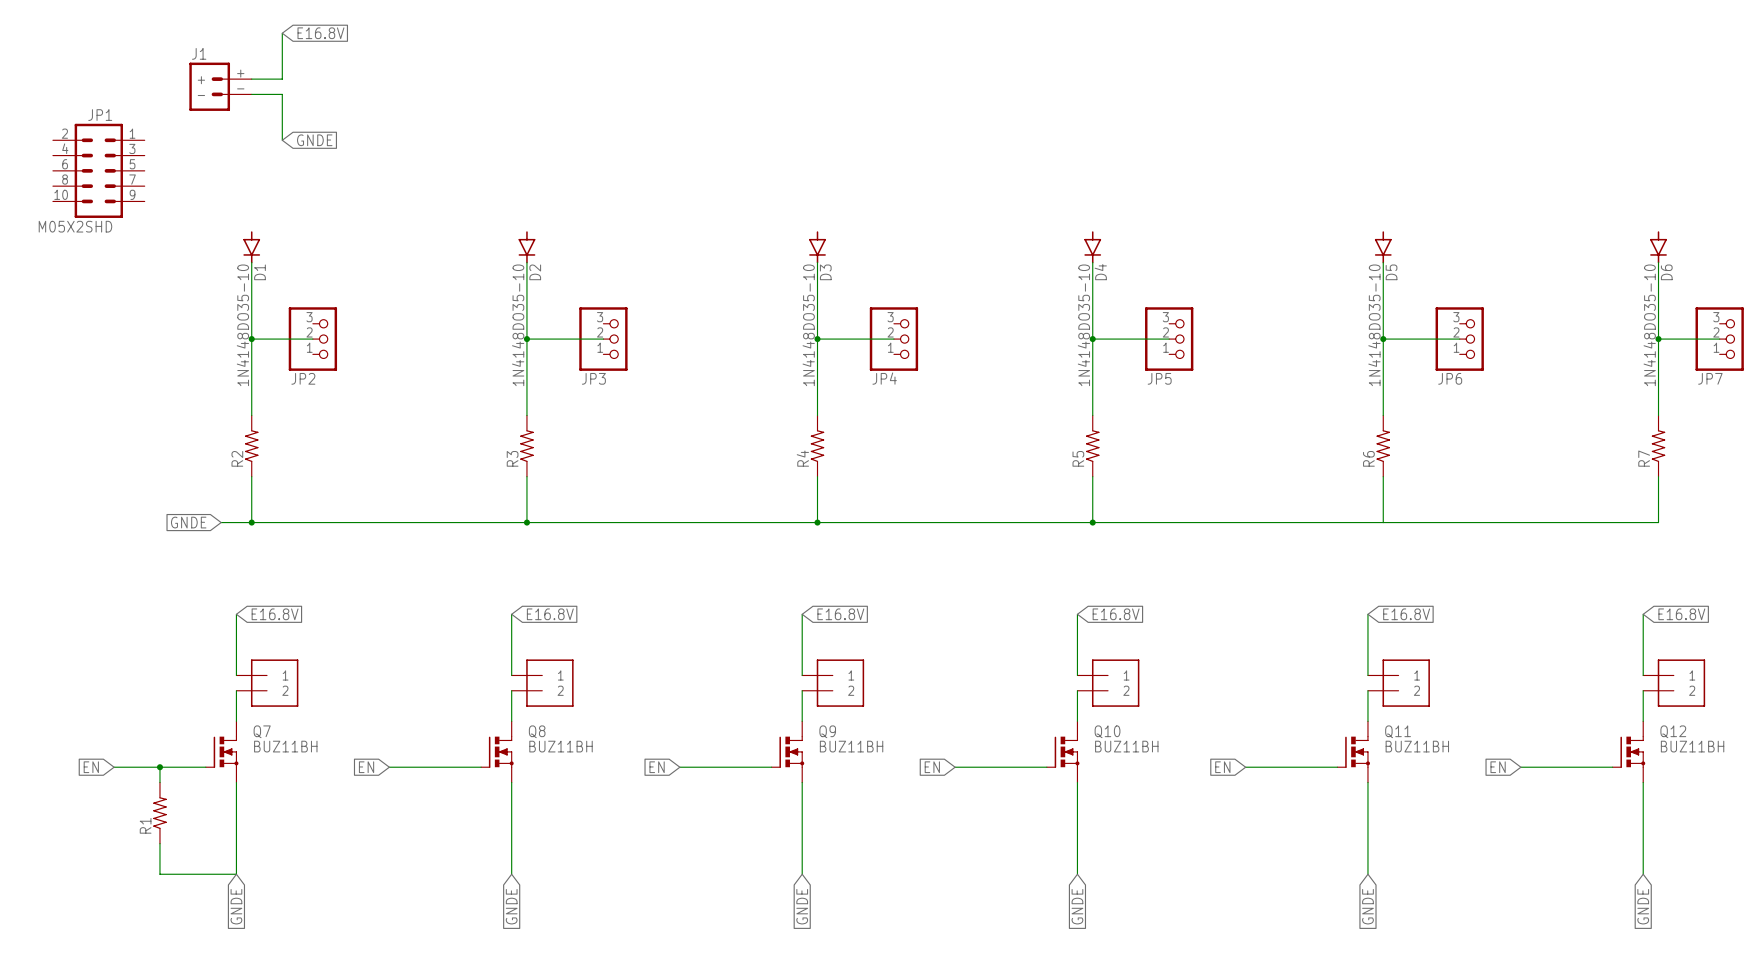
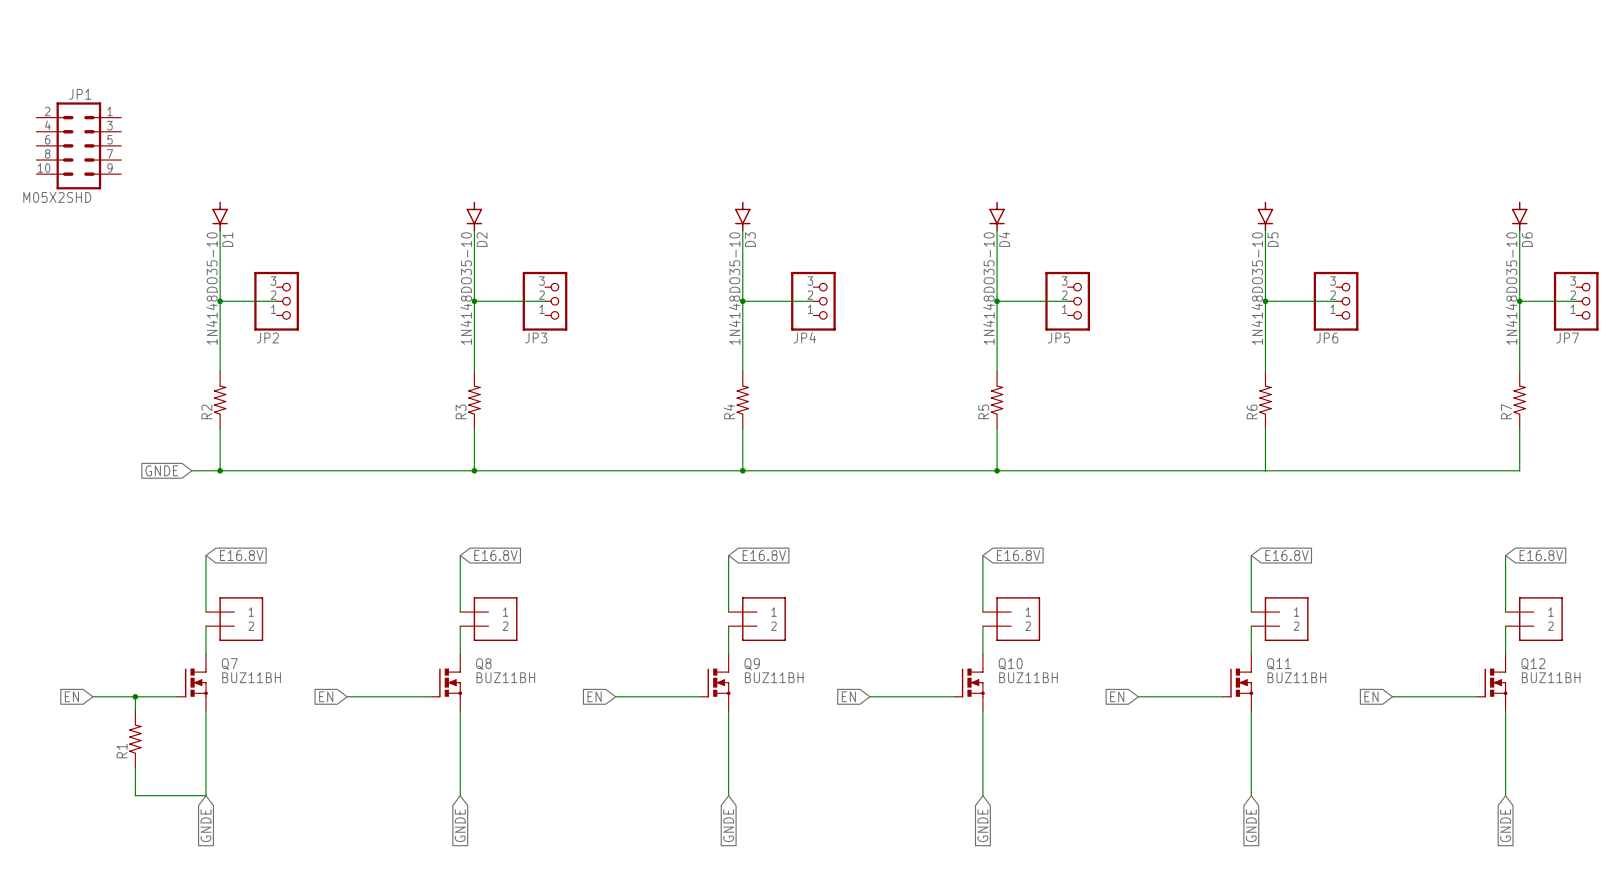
wire: (282, 33) (282, 79) (251, 79) -> none
global label: E16.8V (320, 33) -> none
J1: (220, 86) -> none
wire: (251, 94) (282, 94) (282, 140) -> none
global label: GNDE (314, 140) -> none

